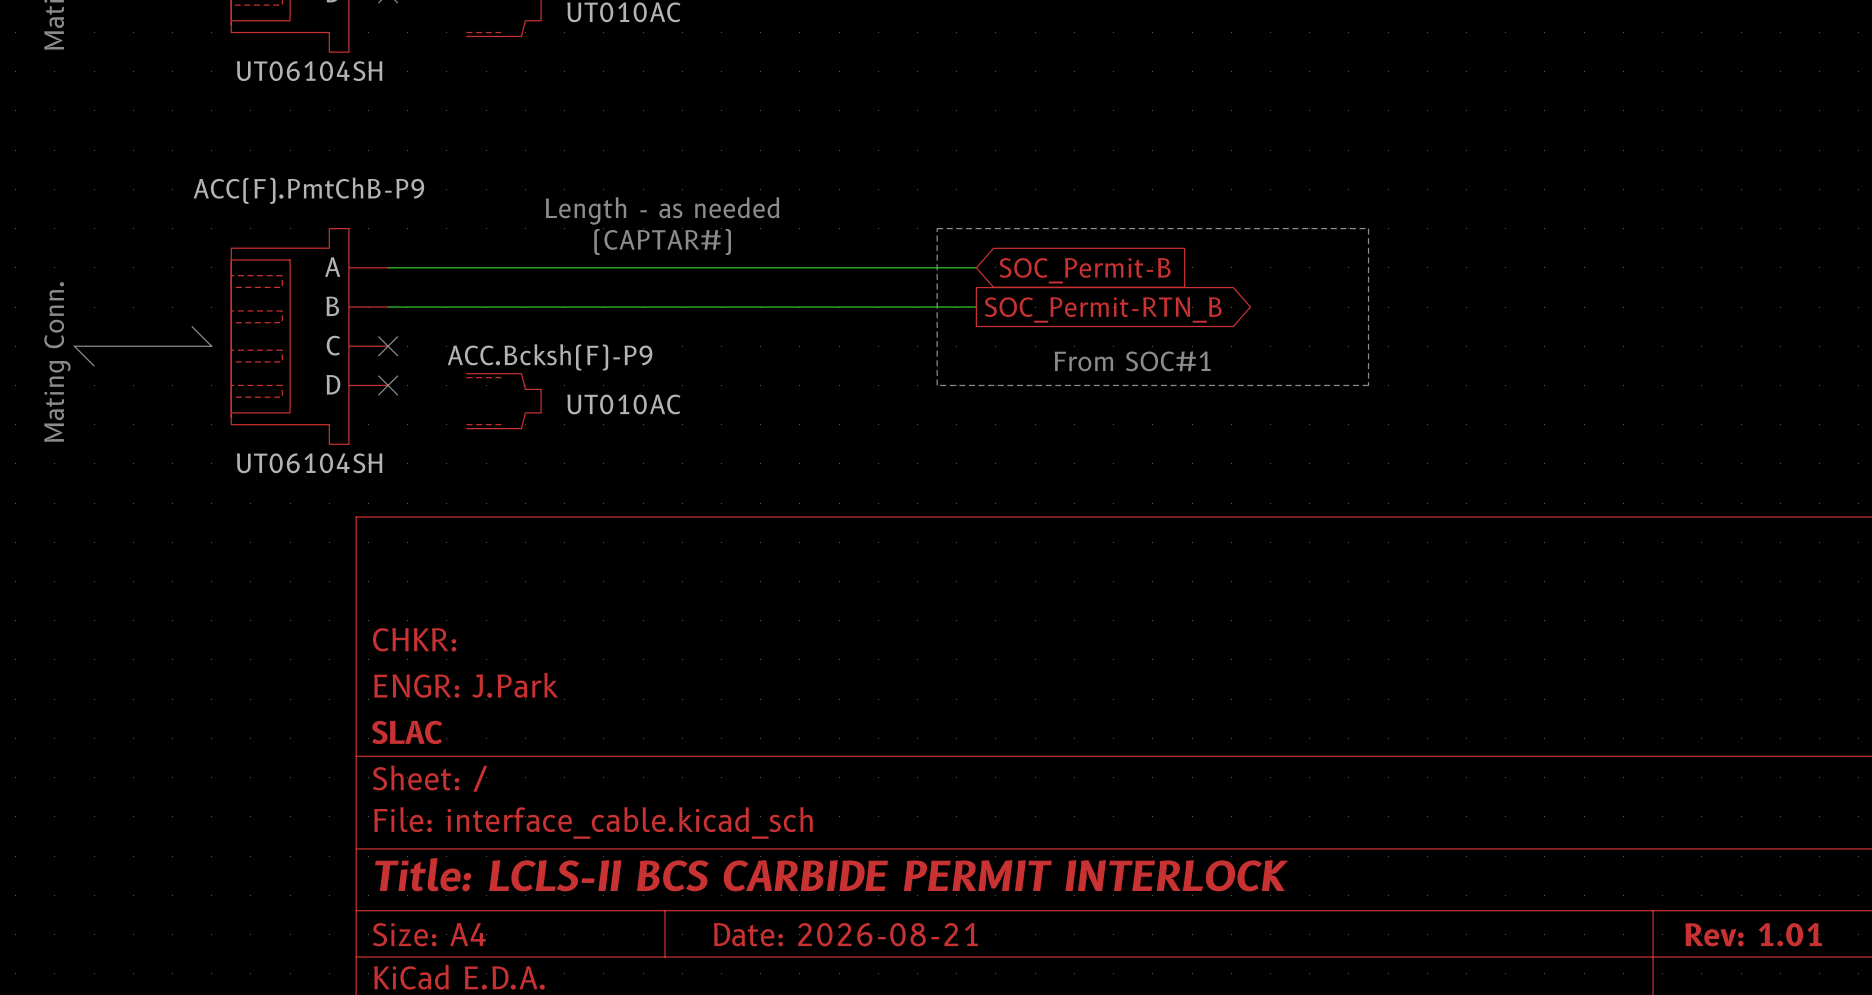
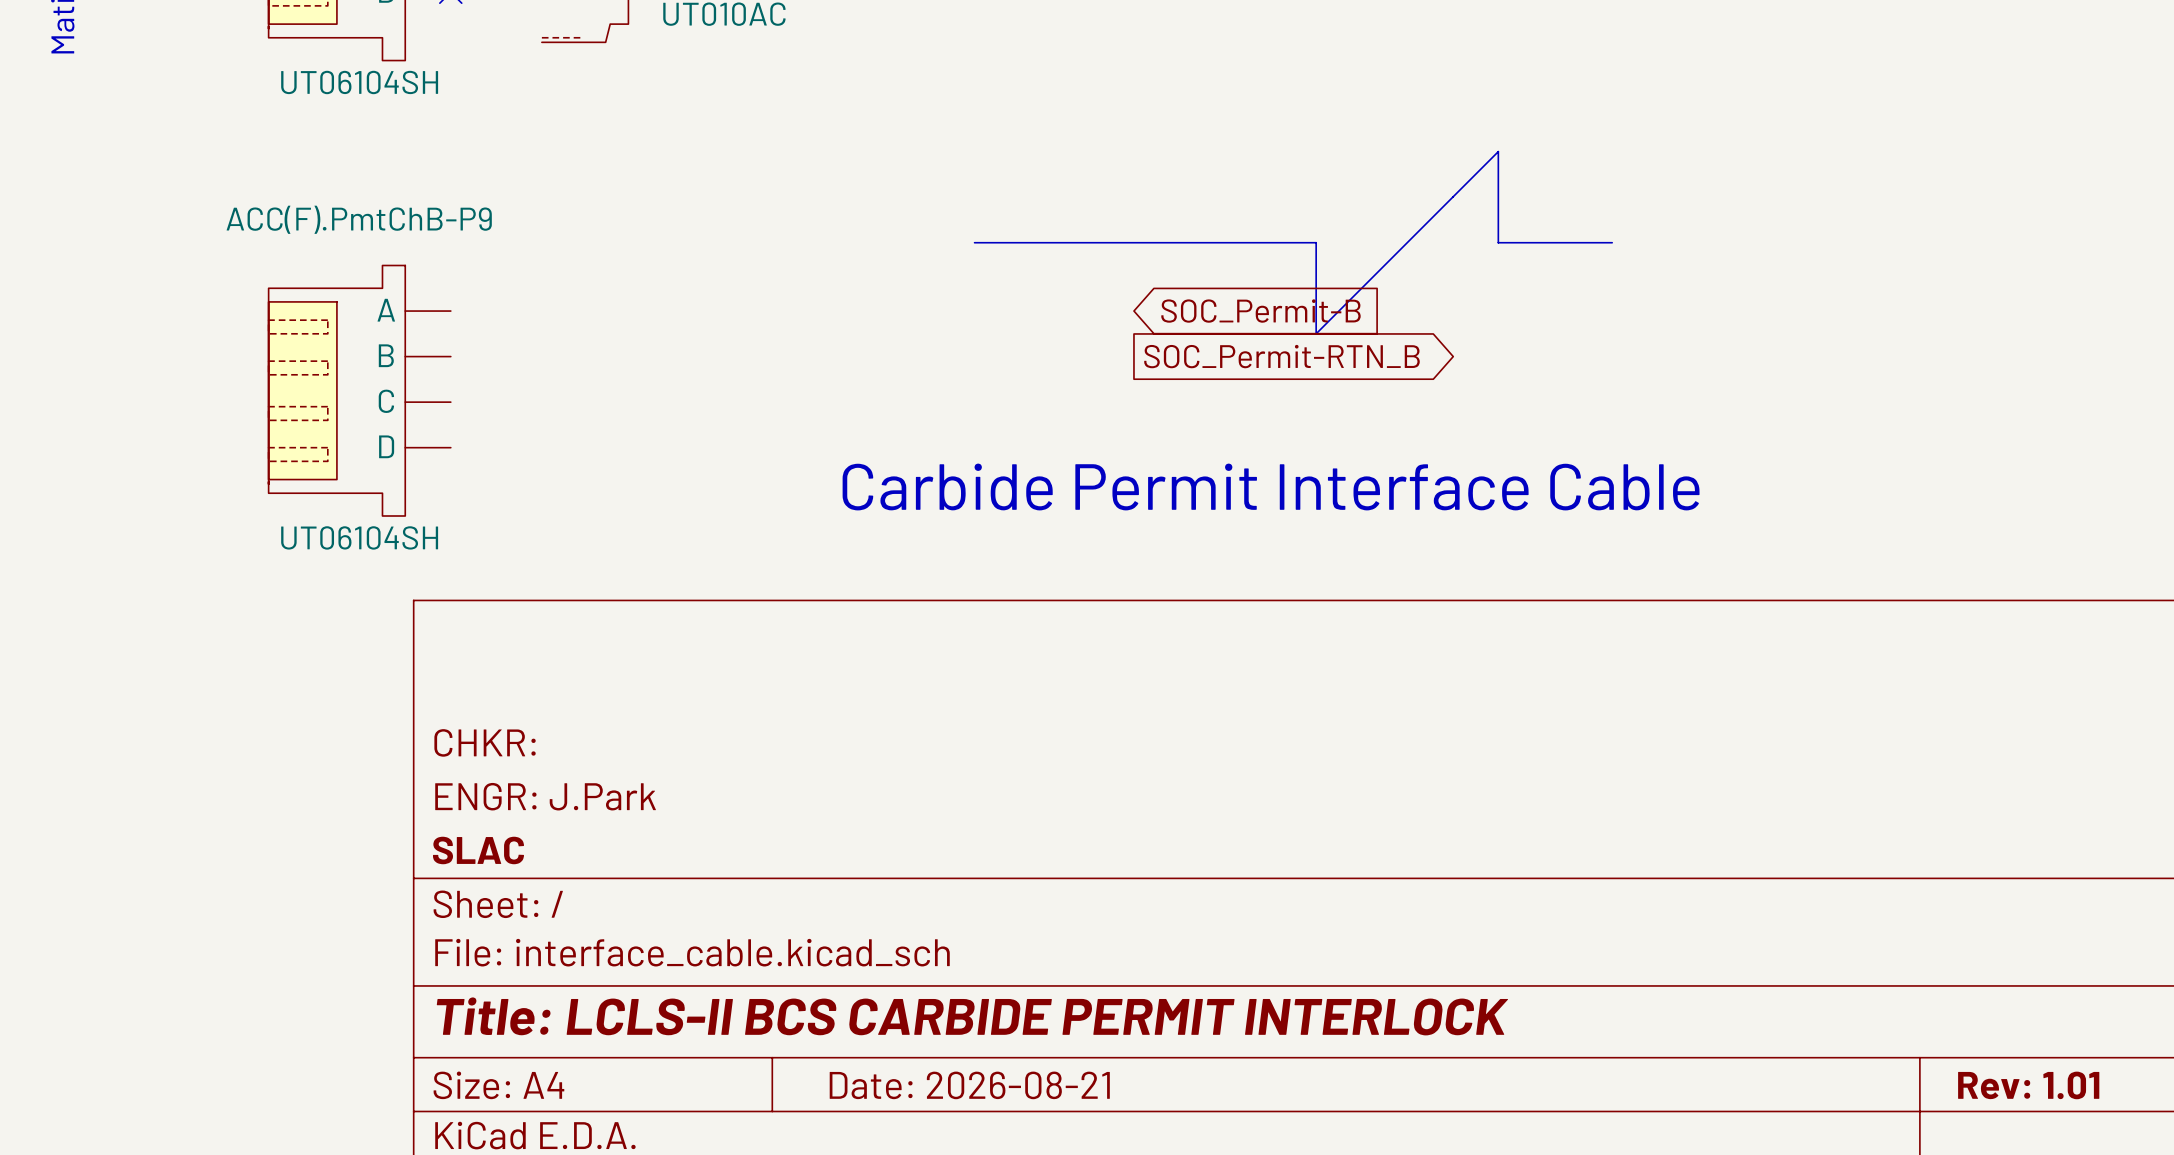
line: none -> (974, 242) (1316, 242) (1316, 333) (1498, 151) (1498, 242) (1612, 242)
text: Length - as needed (662, 210) -> none
line: (937, 228) (937, 385) (1368, 385) (1368, 228) (937, 228) -> none
text: (CAPTAR#) (662, 241) -> none
wire: (388, 267) (976, 267) -> none
wire: (388, 307) (976, 307) -> none
line: (192, 326) (211, 346) (74, 346) (94, 365) -> none
no-connect mark: (388, 346) -> none
text: From SOC#1 (1132, 361) -> none
text: Mating Conn. (57, 362) -> none
no-connect mark: (388, 385) -> none
ACC.Bcksh(F)-P9: UT010AC (503, 401) -> none
text: none -> Carbide Permit Interface Cable (1271, 487)

